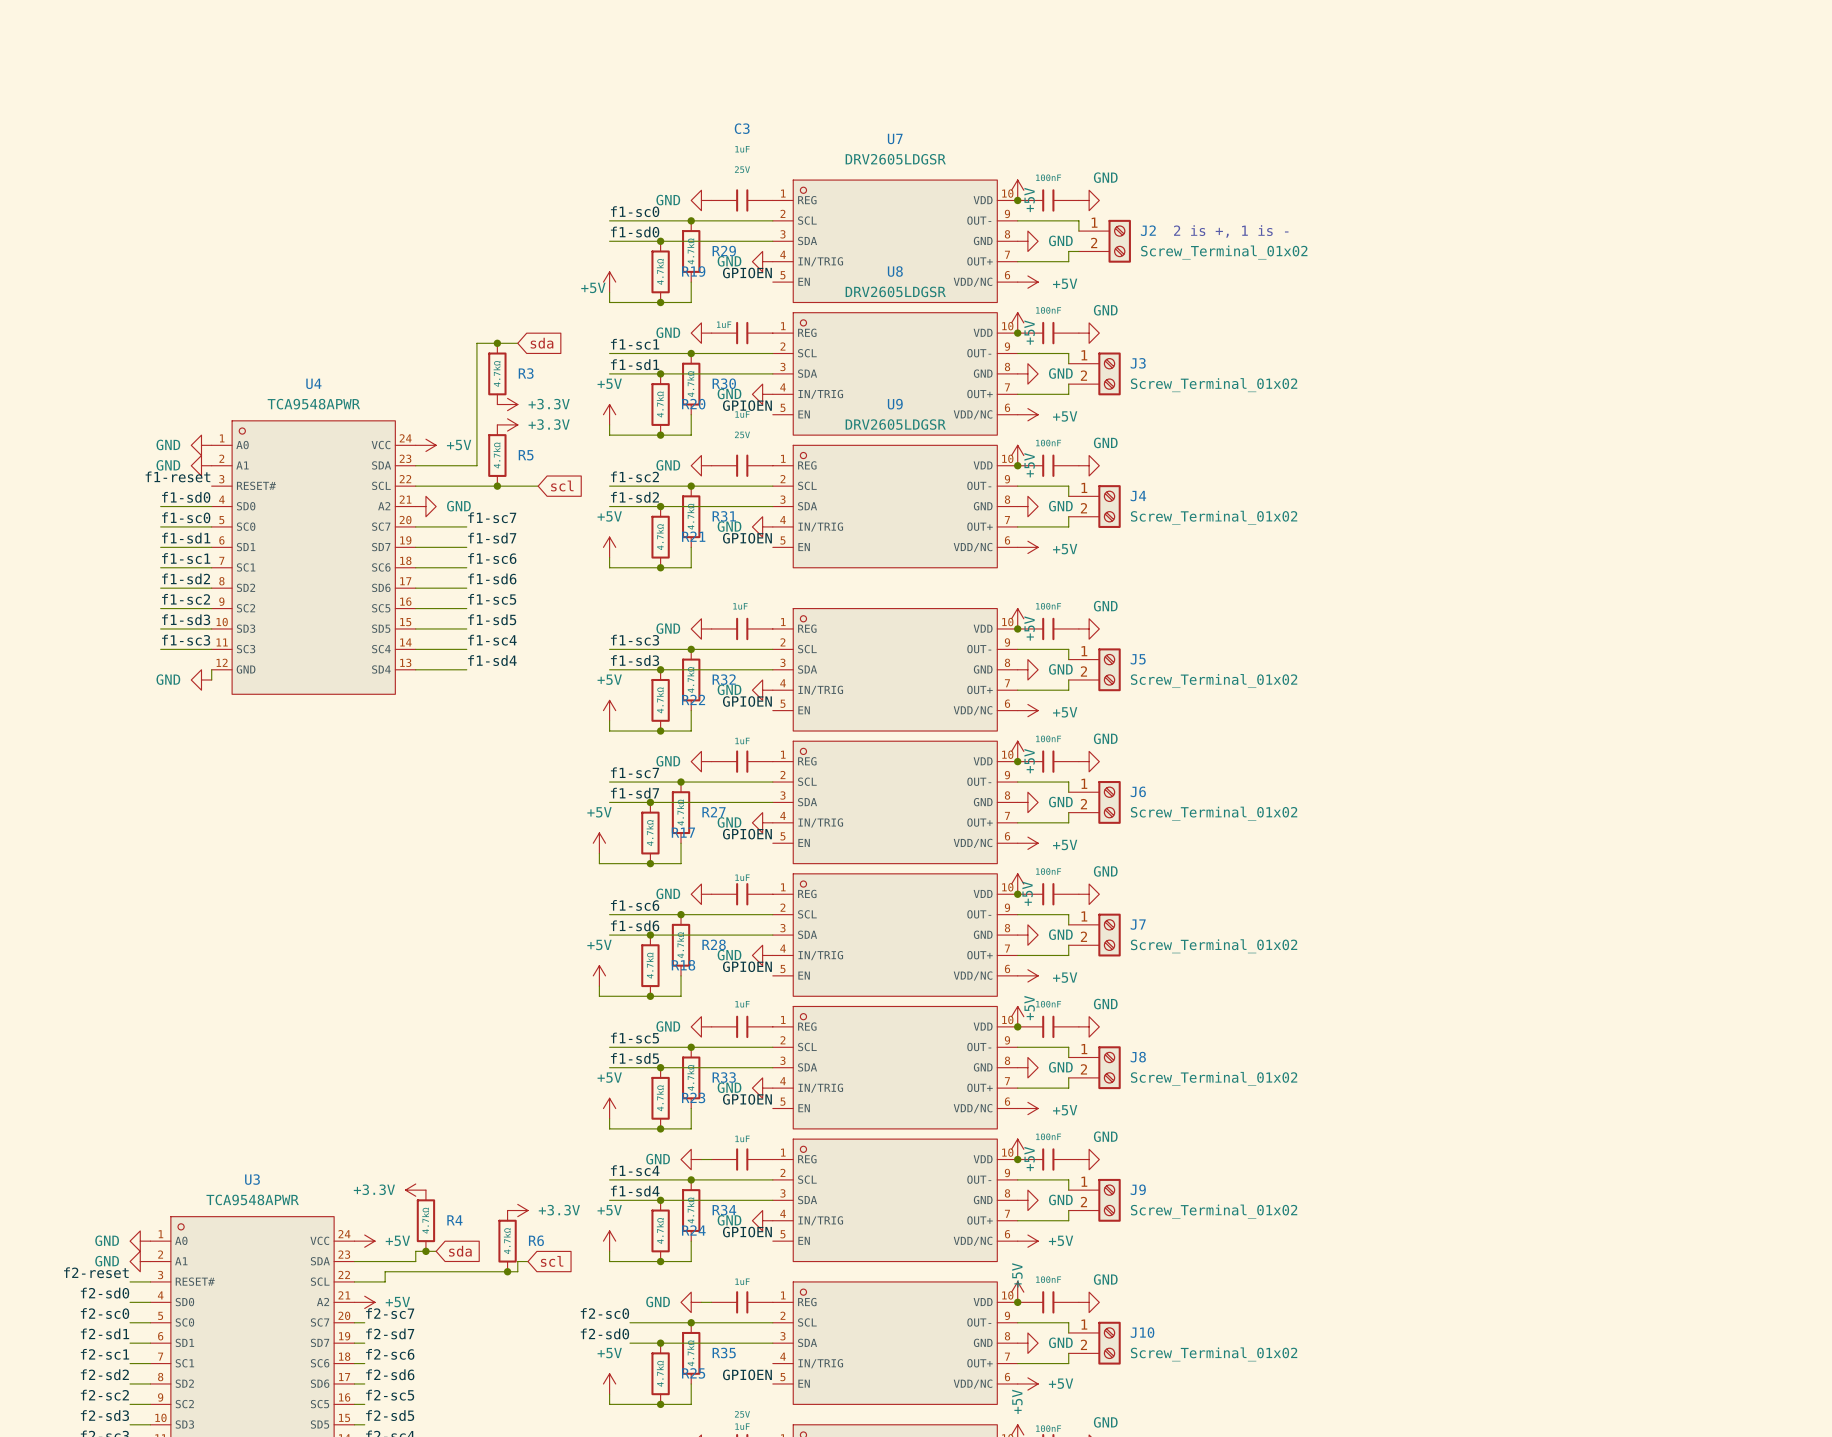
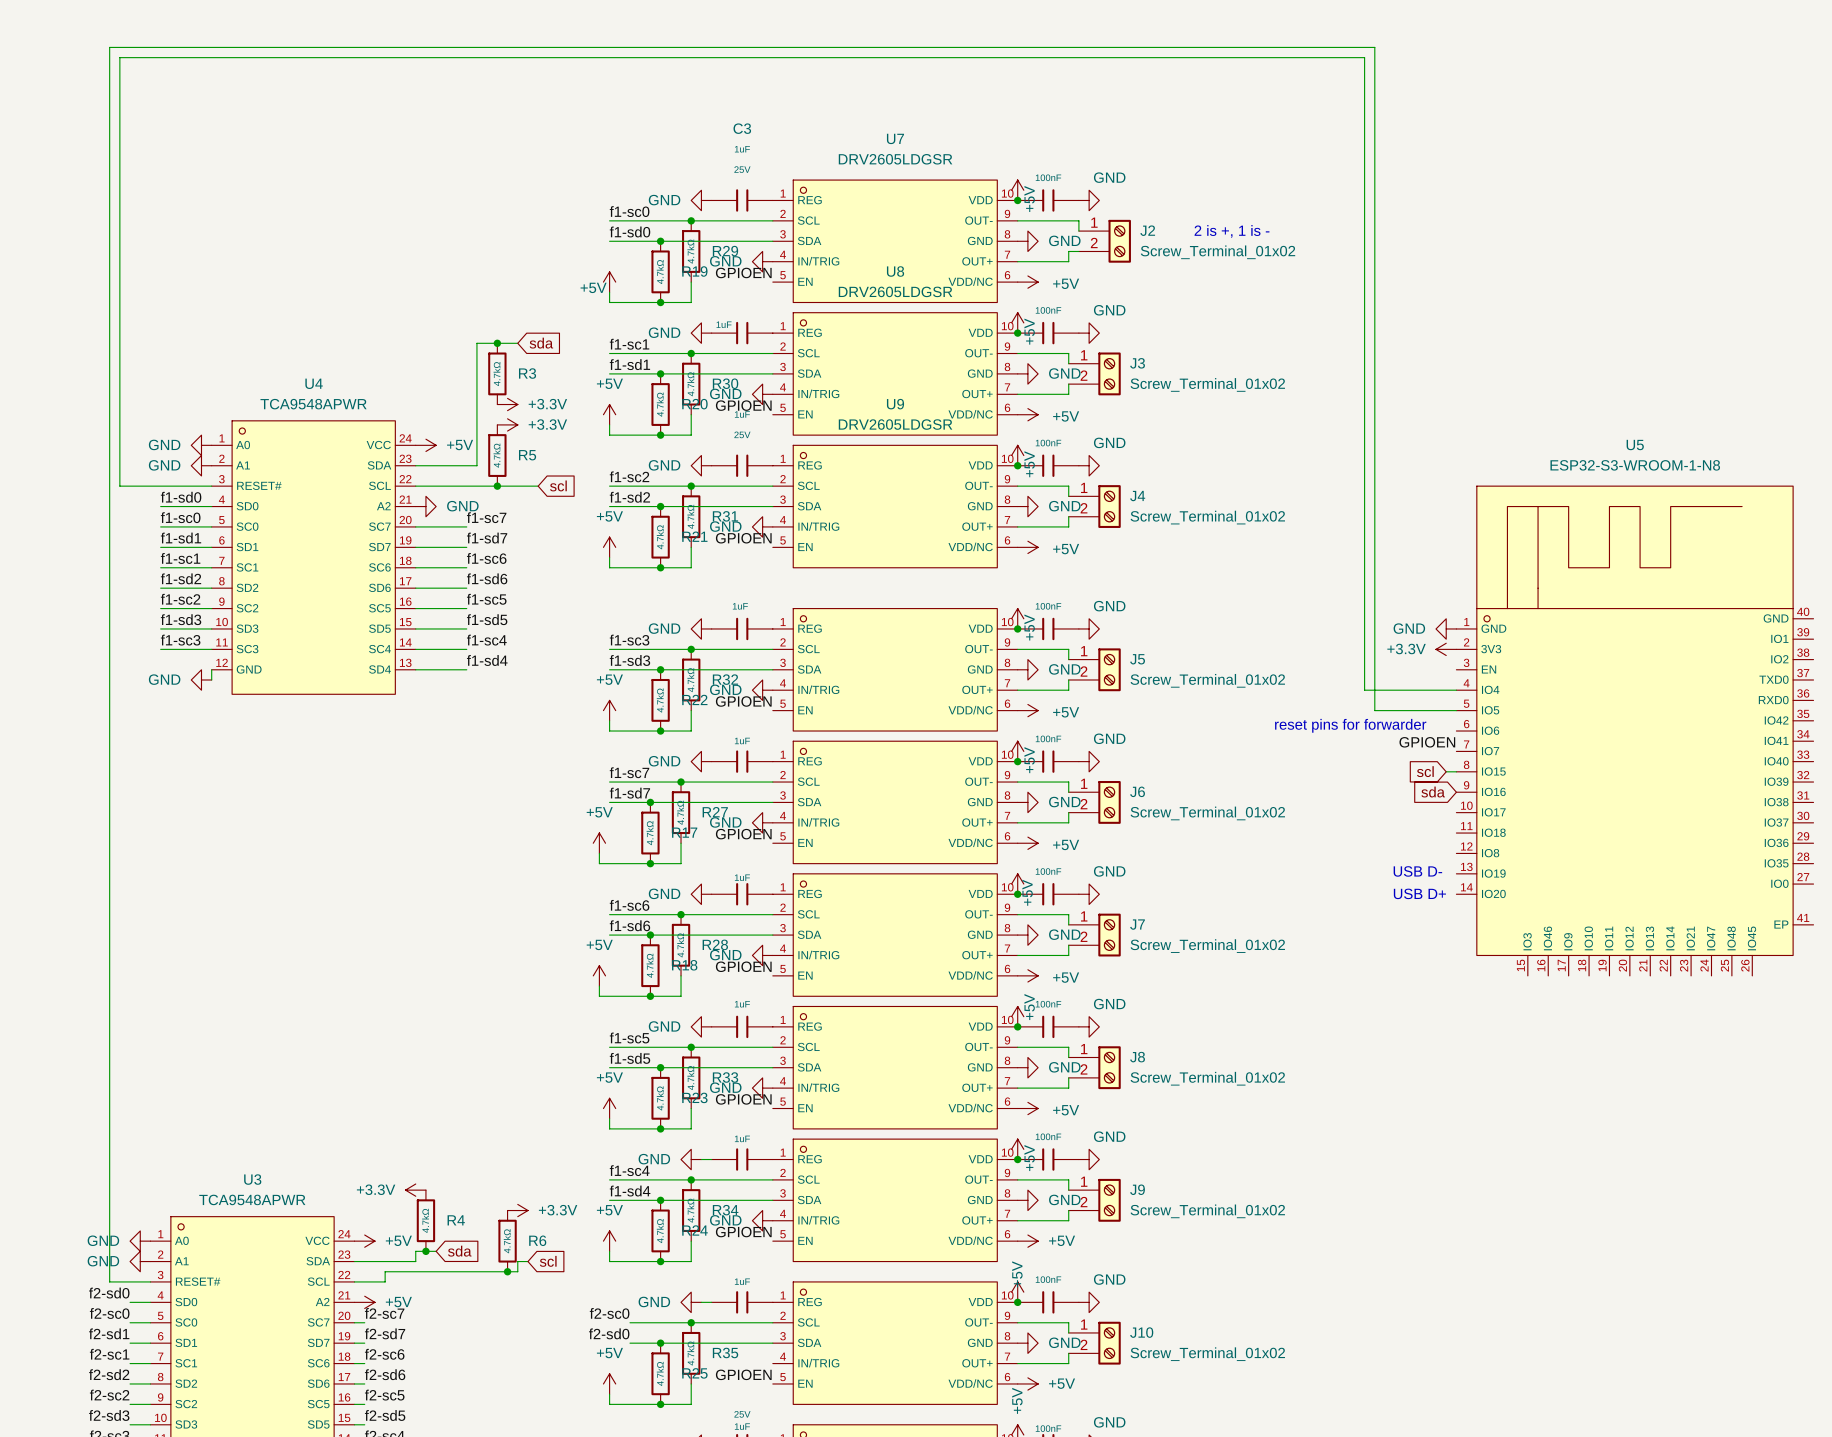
label: f1-reset (177, 476) -> none
wire: none -> (211, 486) (119, 486) (119, 57) (1364, 57) (1364, 690) (1456, 690)
power symbol: none -> GND (1446, 628)
power symbol: none -> +3.3V (1446, 649)
wire: none -> (1456, 710) (1374, 710) (1374, 47) (109, 47) (109, 1281) (130, 1281)
text: none -> reset pins for forwarder (1350, 725)
U5: none -> ESP32-S3-WROOM-1-N8 (1634, 731)
label: none -> GPIOEN (1427, 742)
global label: none -> scl (1425, 771)
wire: none -> (1446, 771) (1456, 771)
global label: none -> sda (1433, 792)
text: none -> USB D- (1417, 871)
text: none -> USB D+ (1419, 893)
label: f2-reset (96, 1272) -> none

